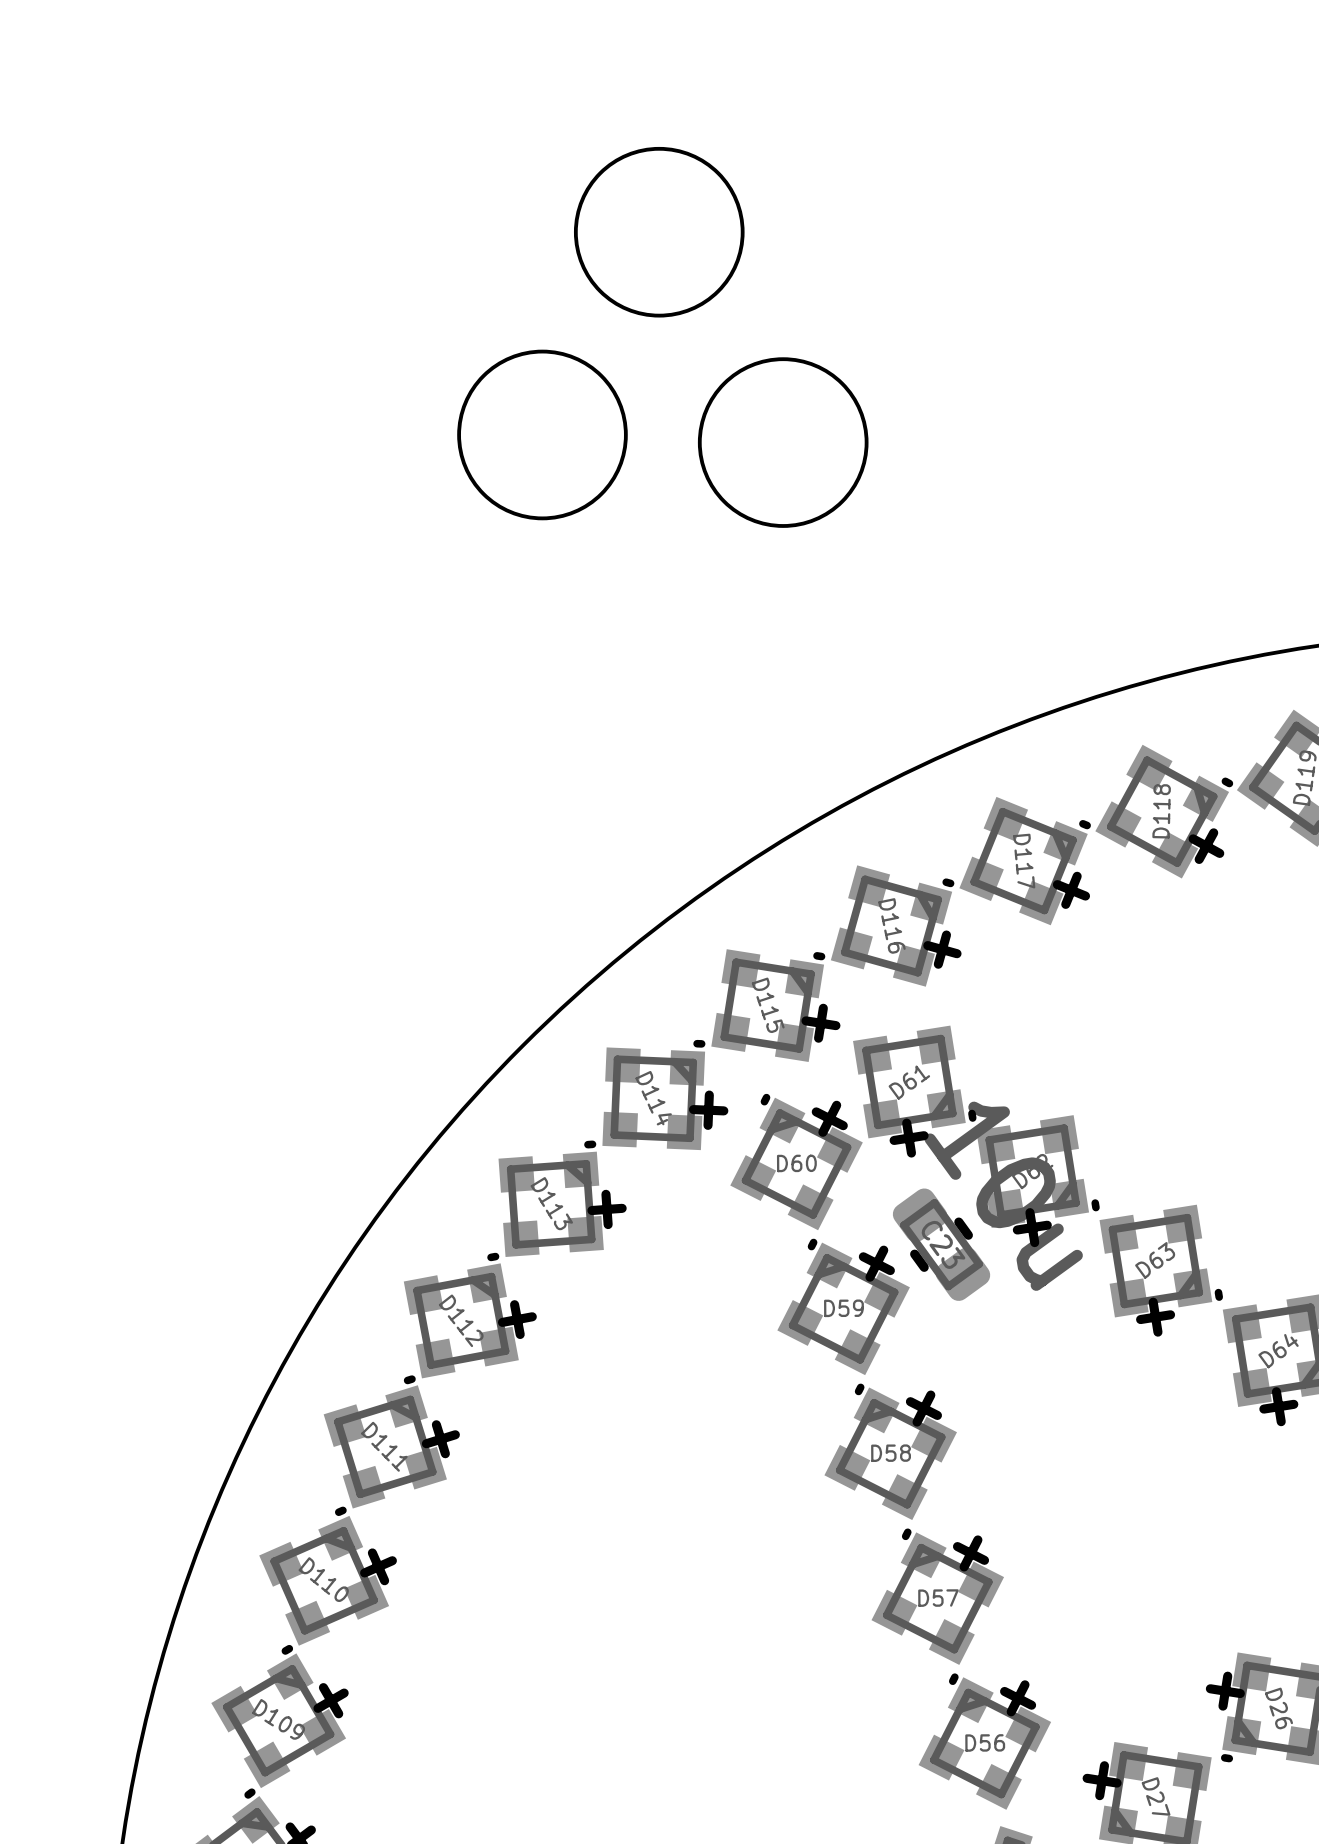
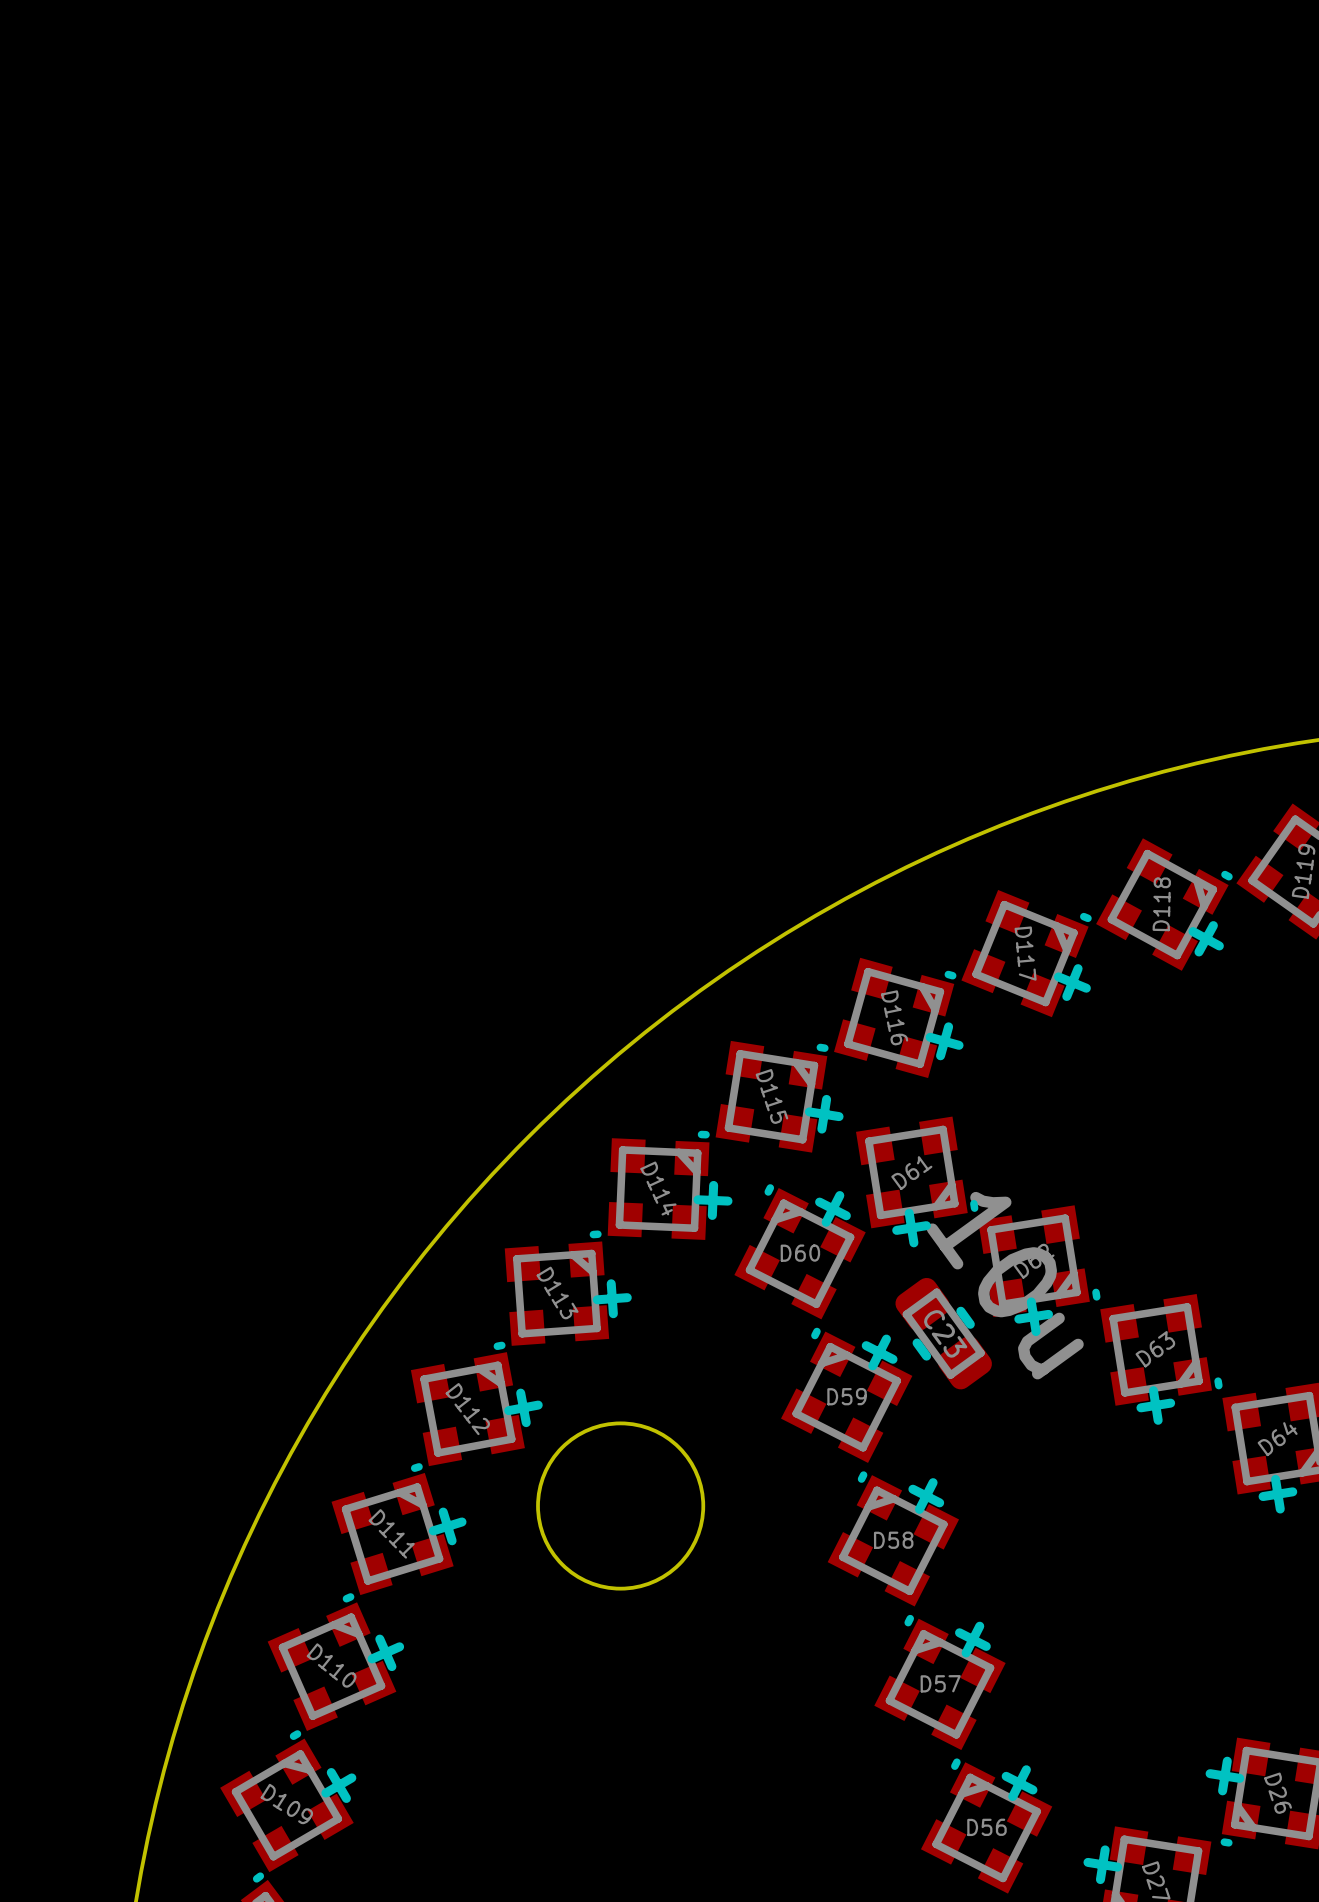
round board edge: [573, 146, 745, 318] -> none
round board edge: [457, 349, 628, 521] -> none
round board edge: [697, 357, 869, 528] -> none
round board edge: none -> [536, 1421, 706, 1591]

